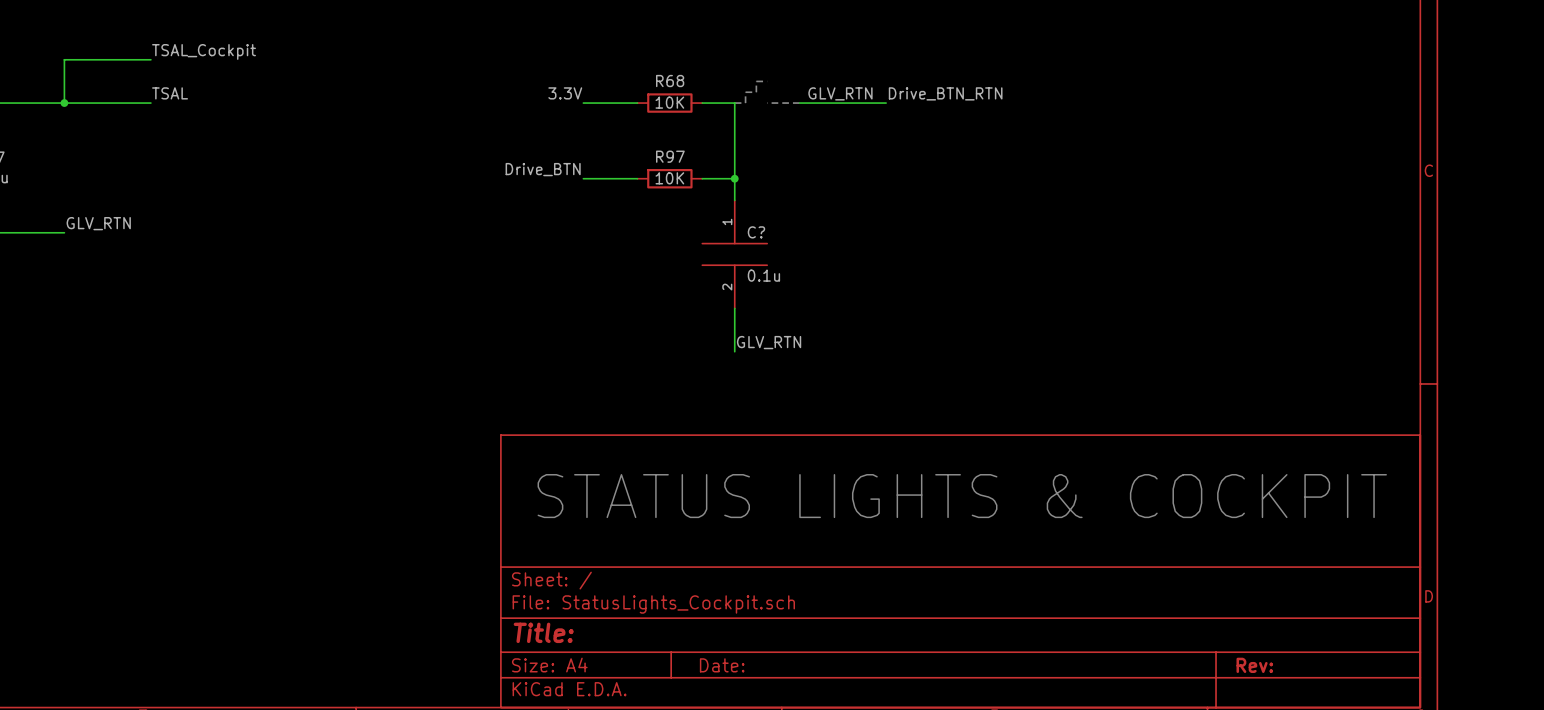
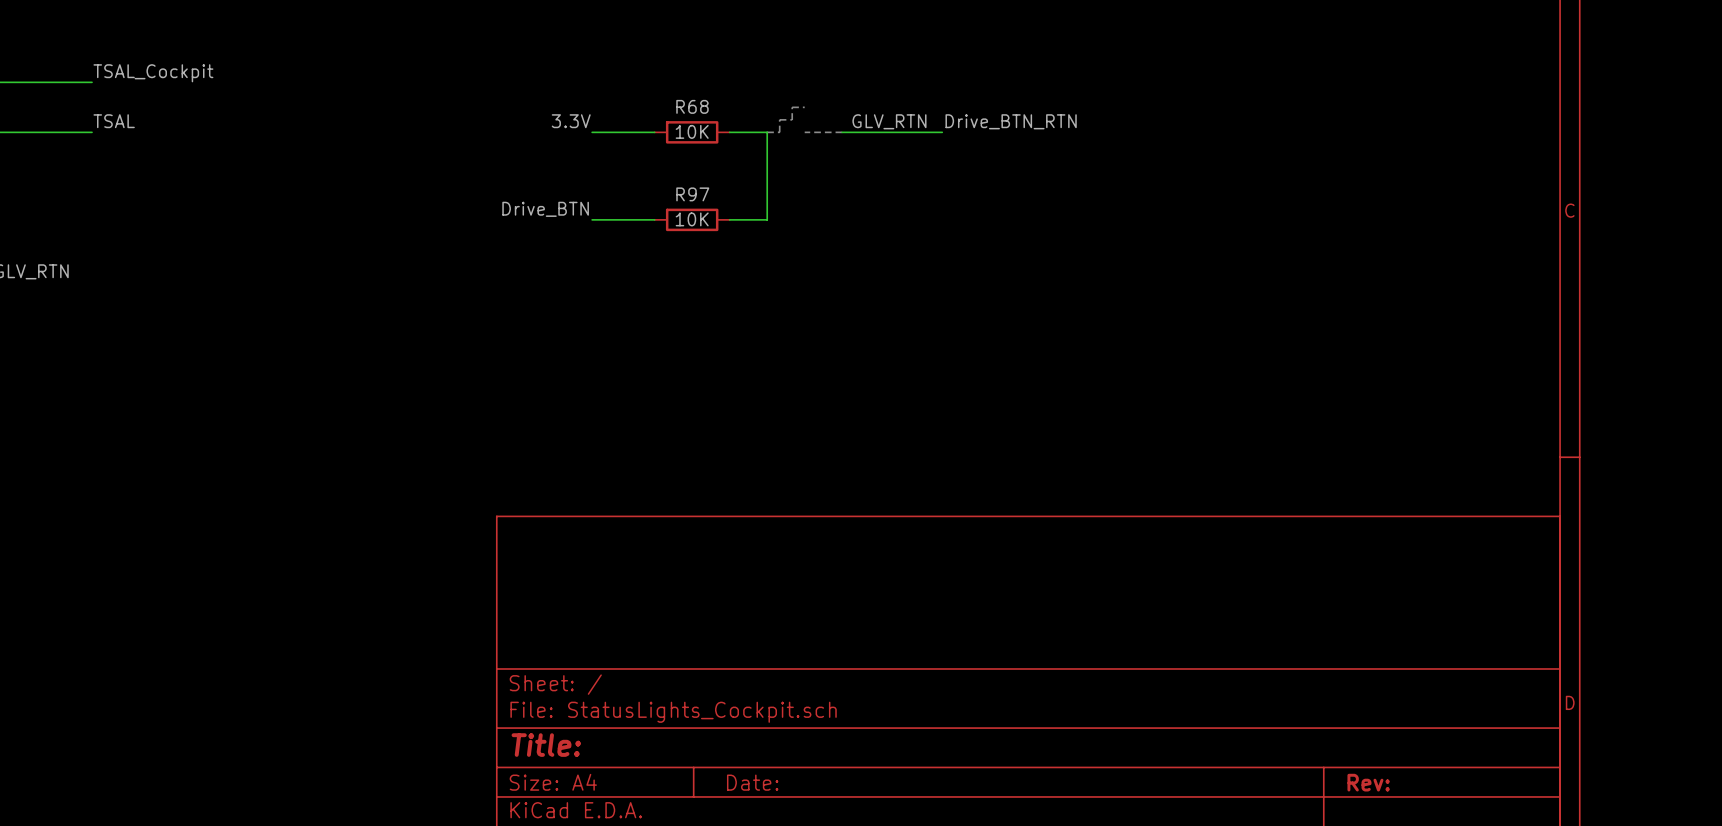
wire: (734, 178) (734, 200) -> none
junction: (734, 178) -> none
C?: 0.1u (734, 254) -> none
wire: (734, 308) (734, 351) -> none
label: GLV_RTN (769, 342) -> none
text: STATUS LIGHTS & COCKPIT (962, 496) -> none

